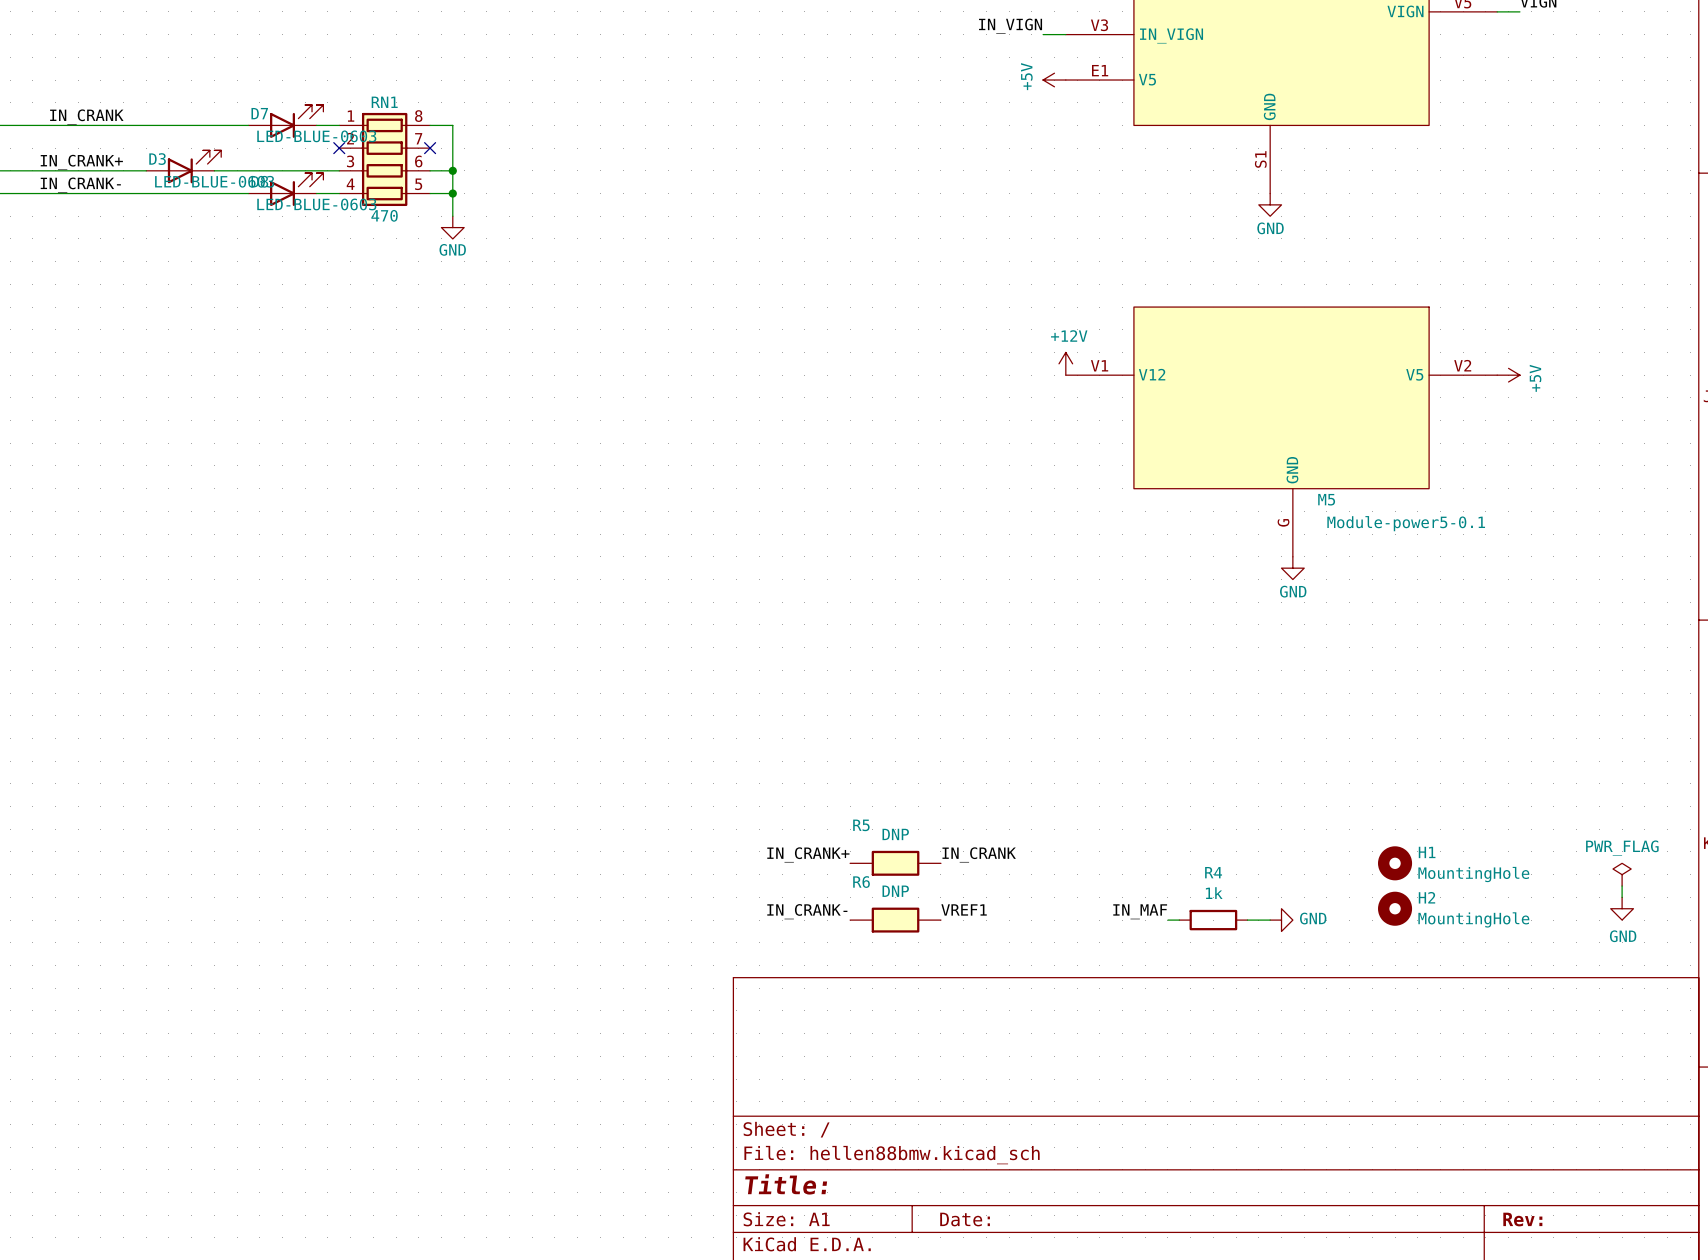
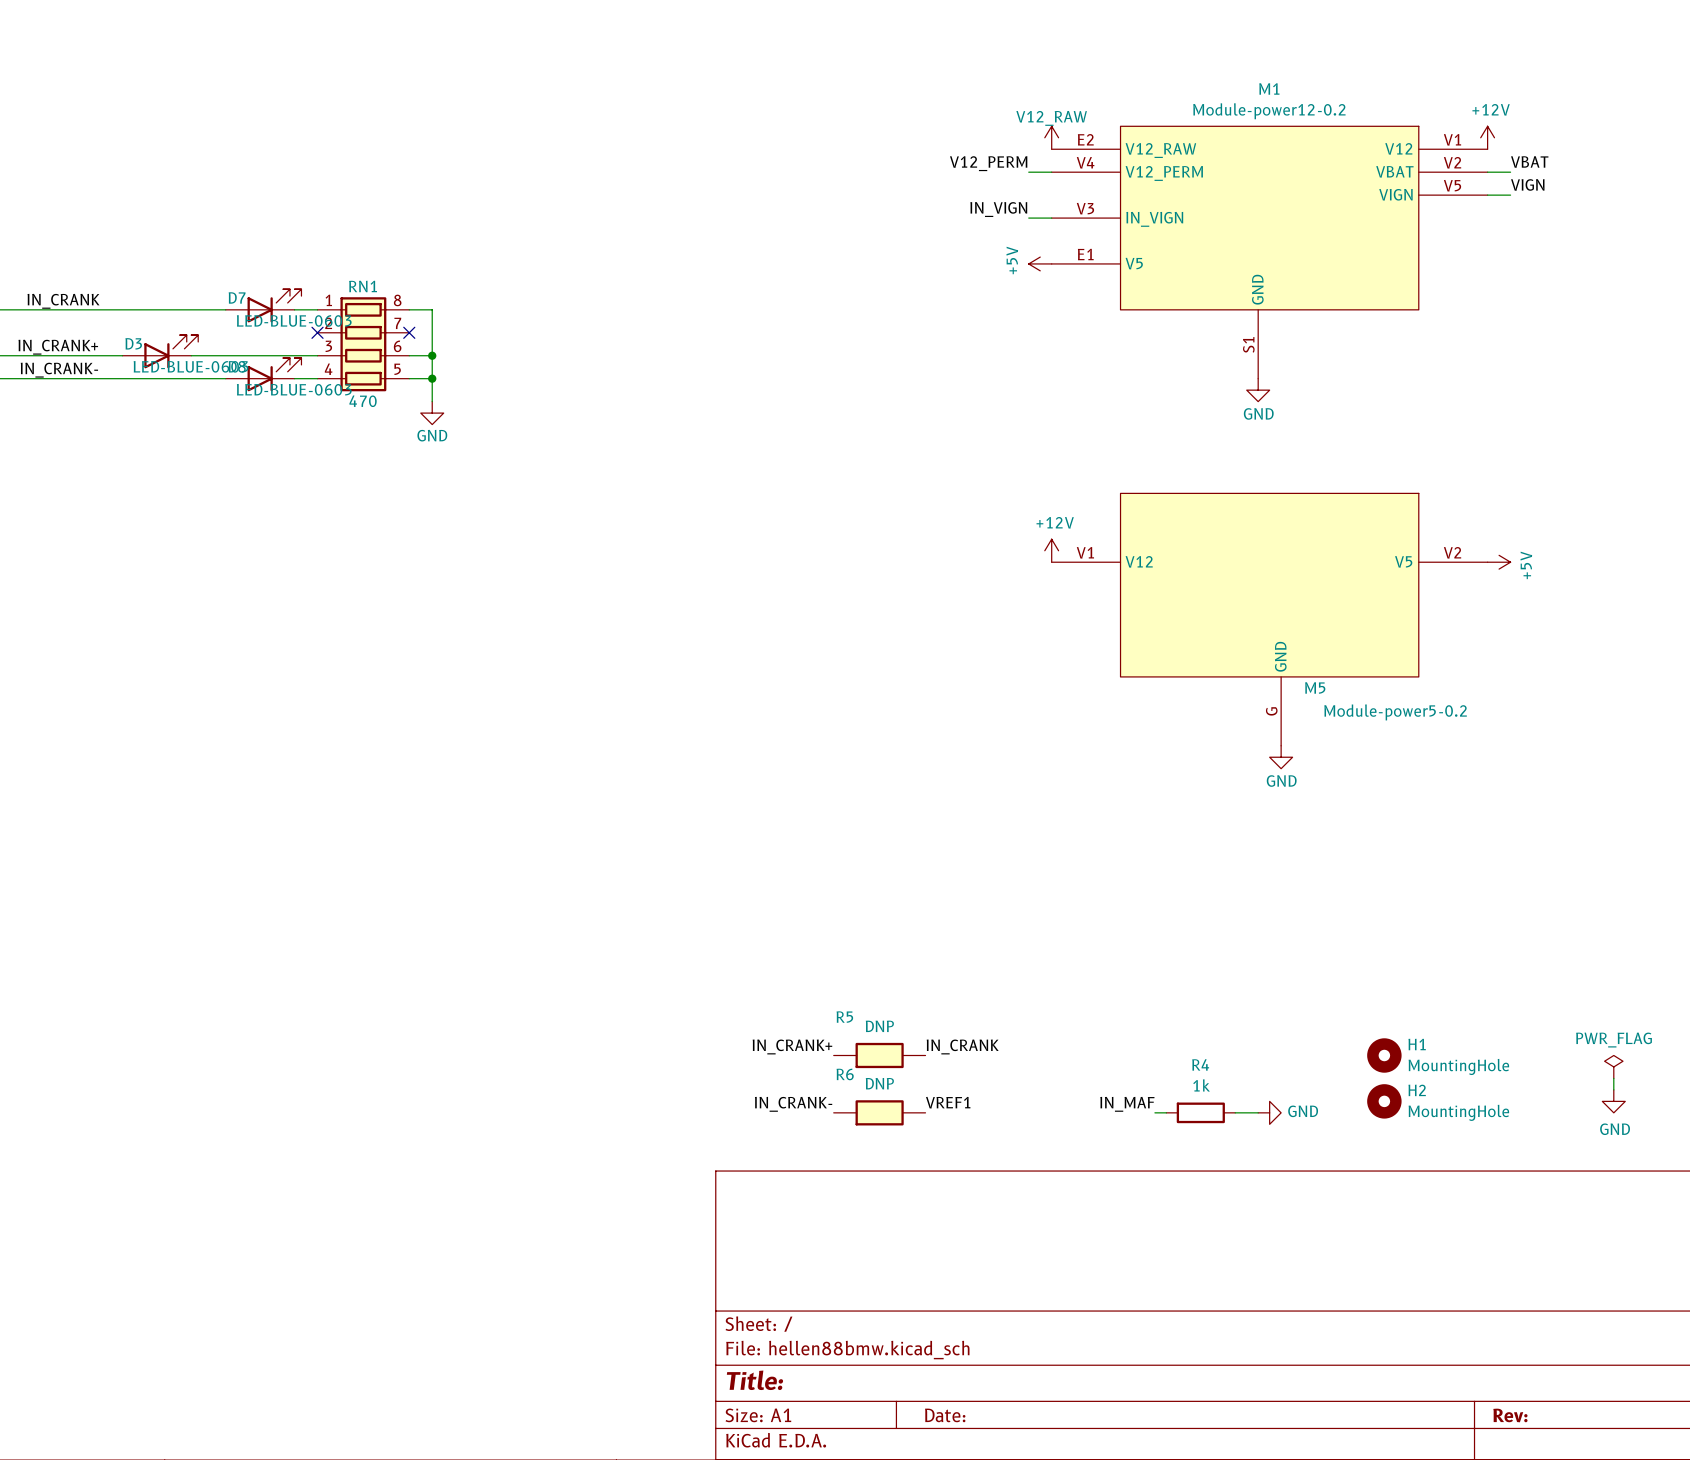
M5 value: Module-power5-0.1 (1406, 523) -> Module-power5-0.2 (1395, 712)

